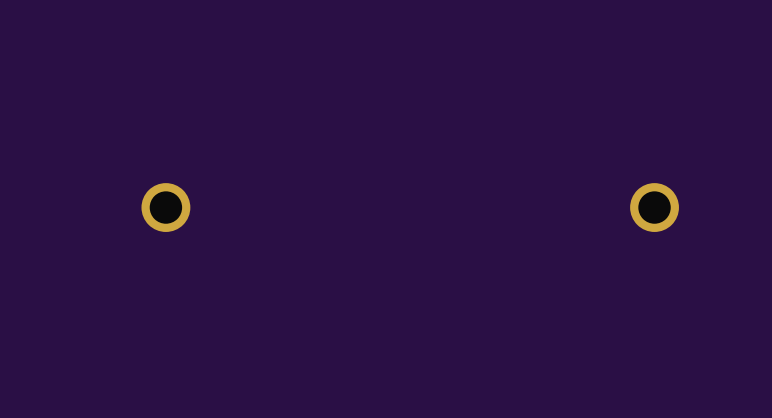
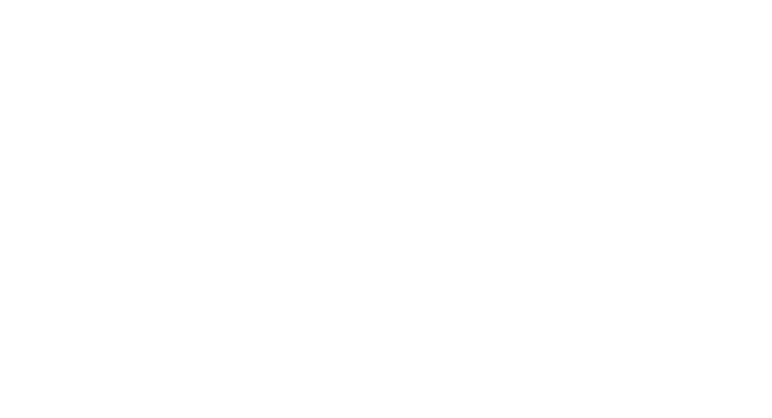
via: (165, 207) -> none
via: (654, 207) -> none

